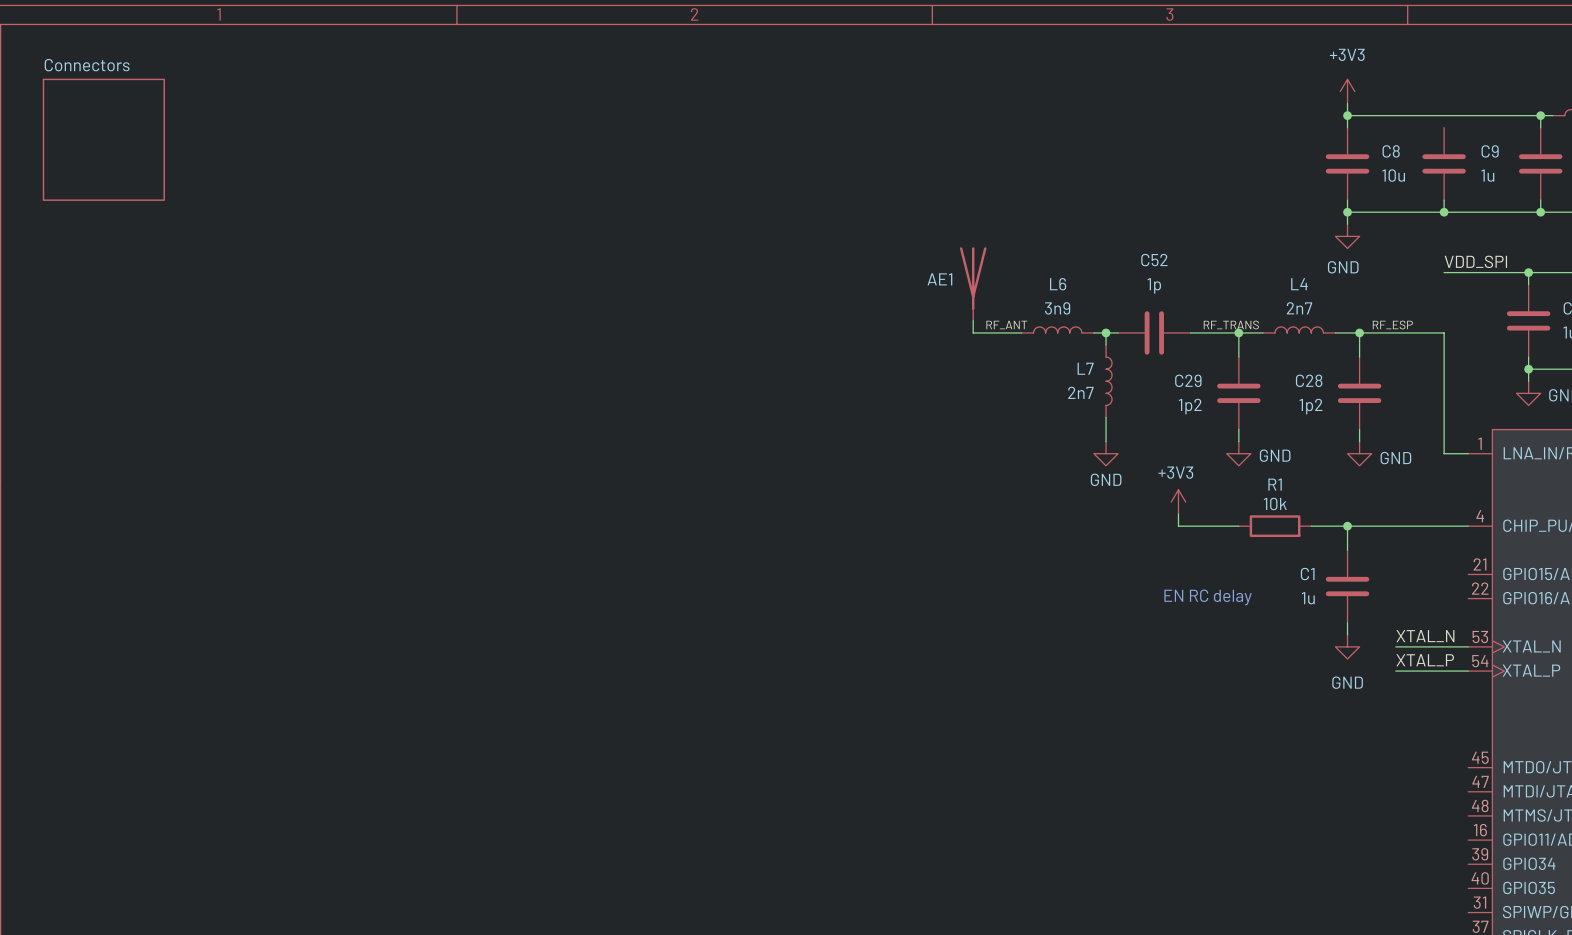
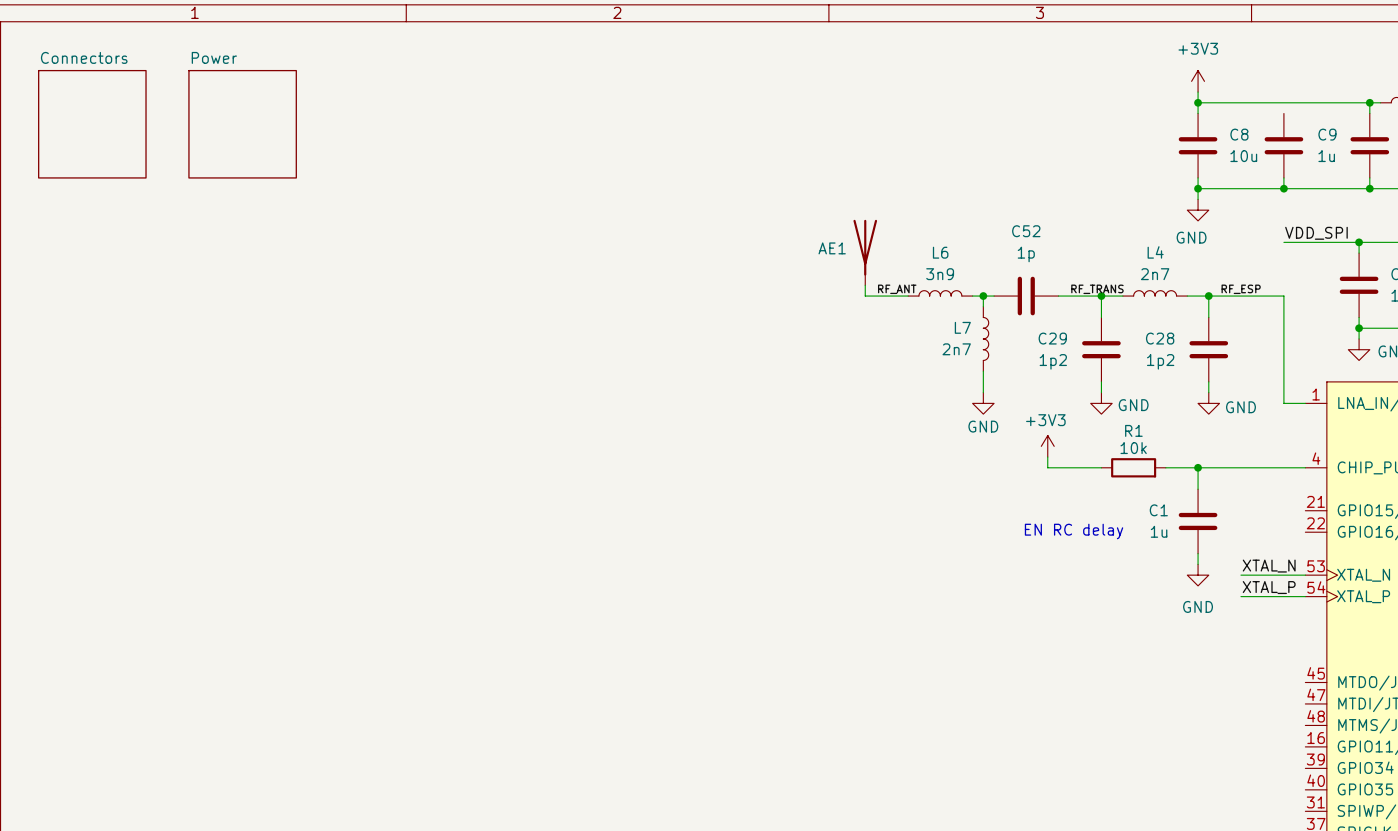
sheet Power: none -> (242, 124)

